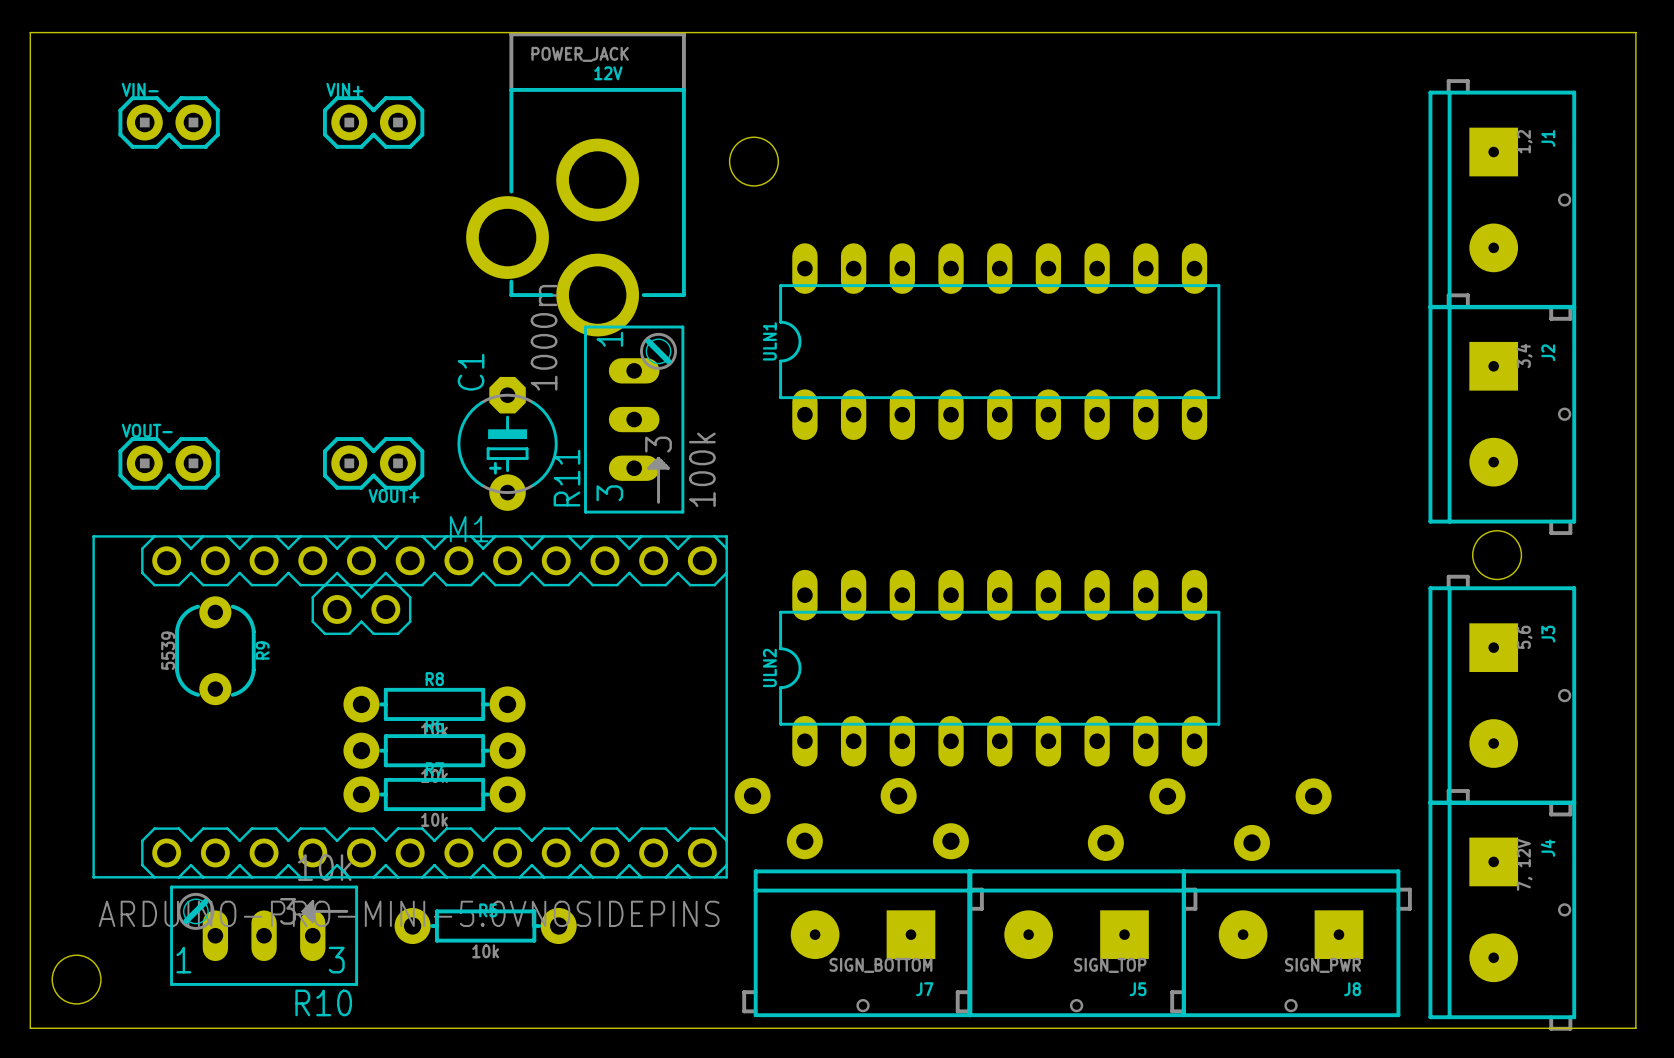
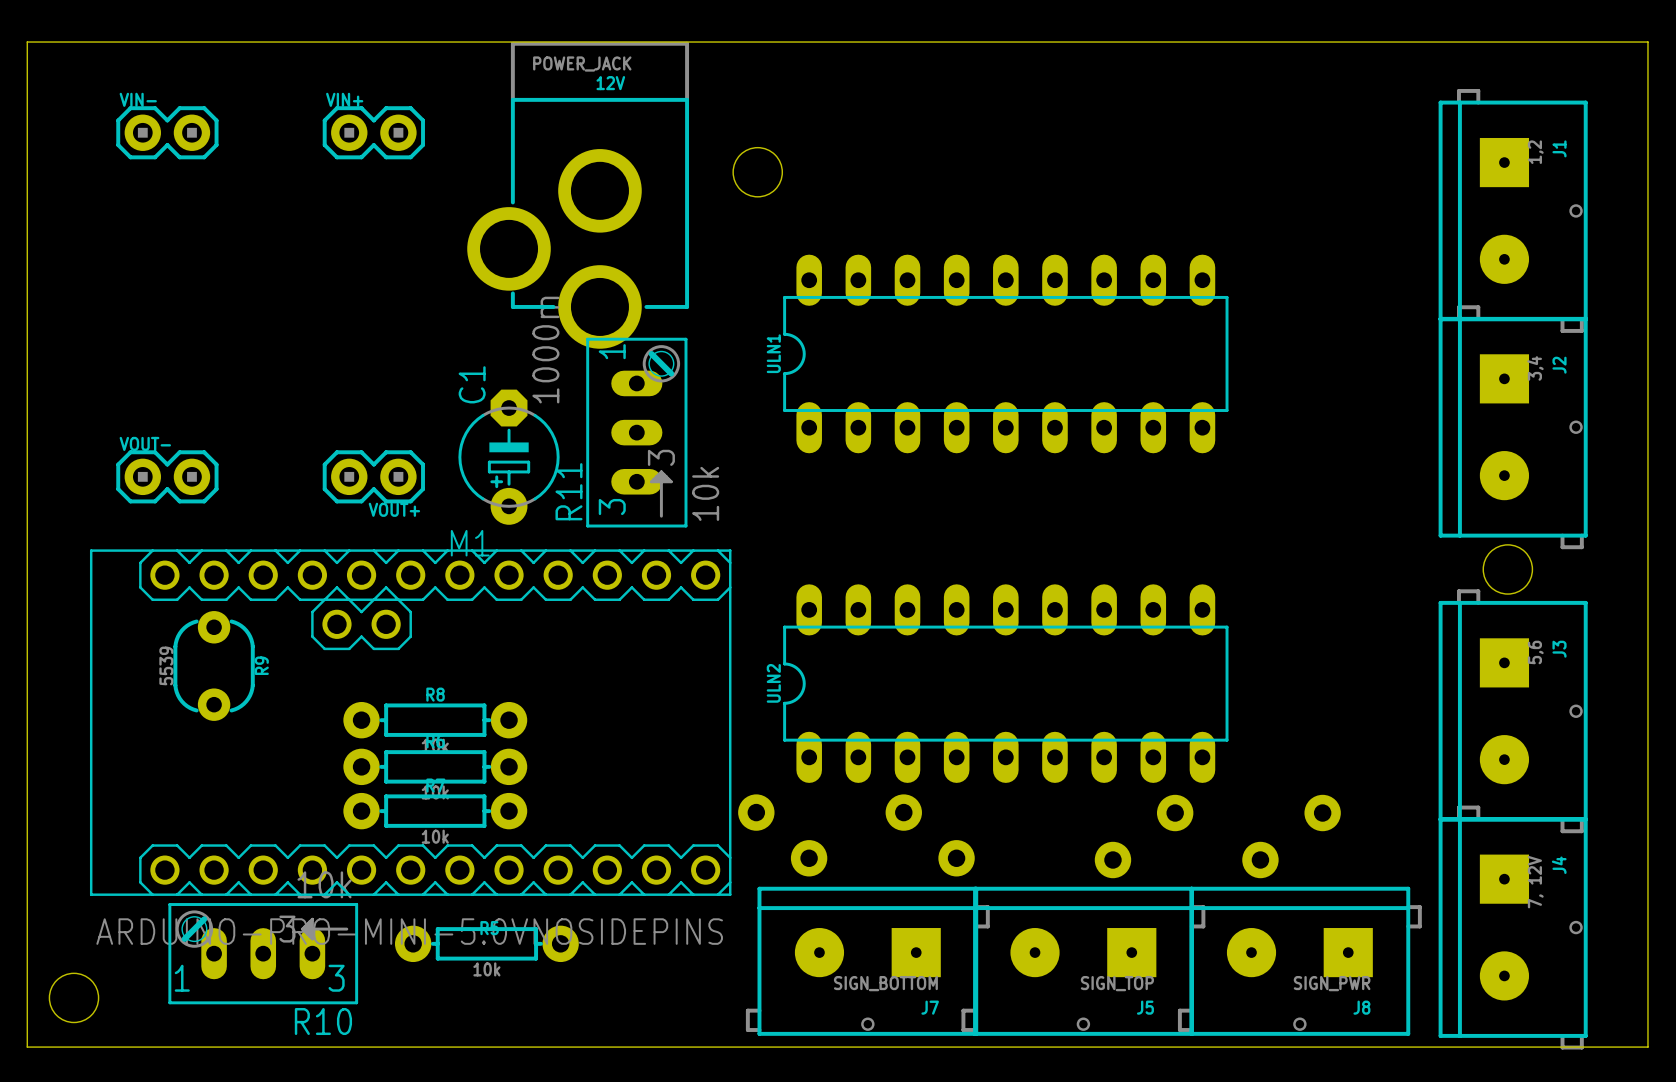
R11 value: 100k (702, 469) -> 10k (705, 493)

